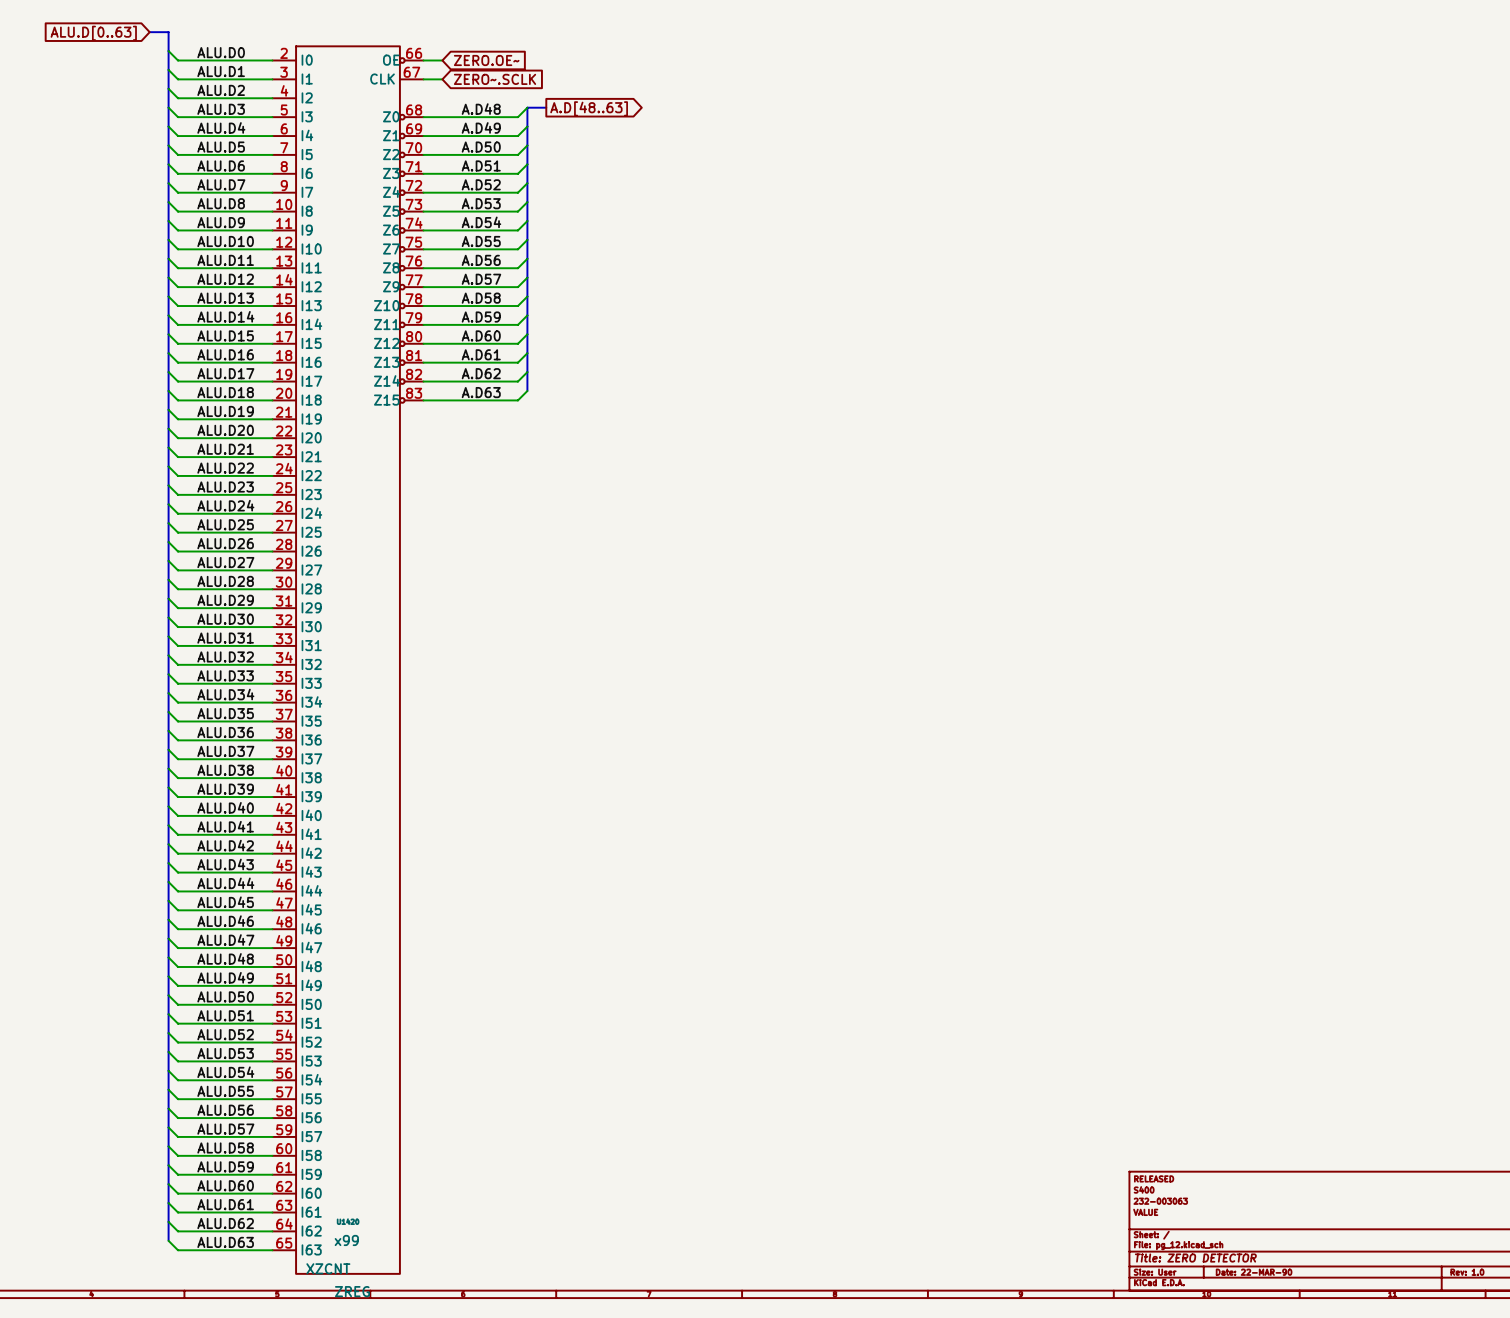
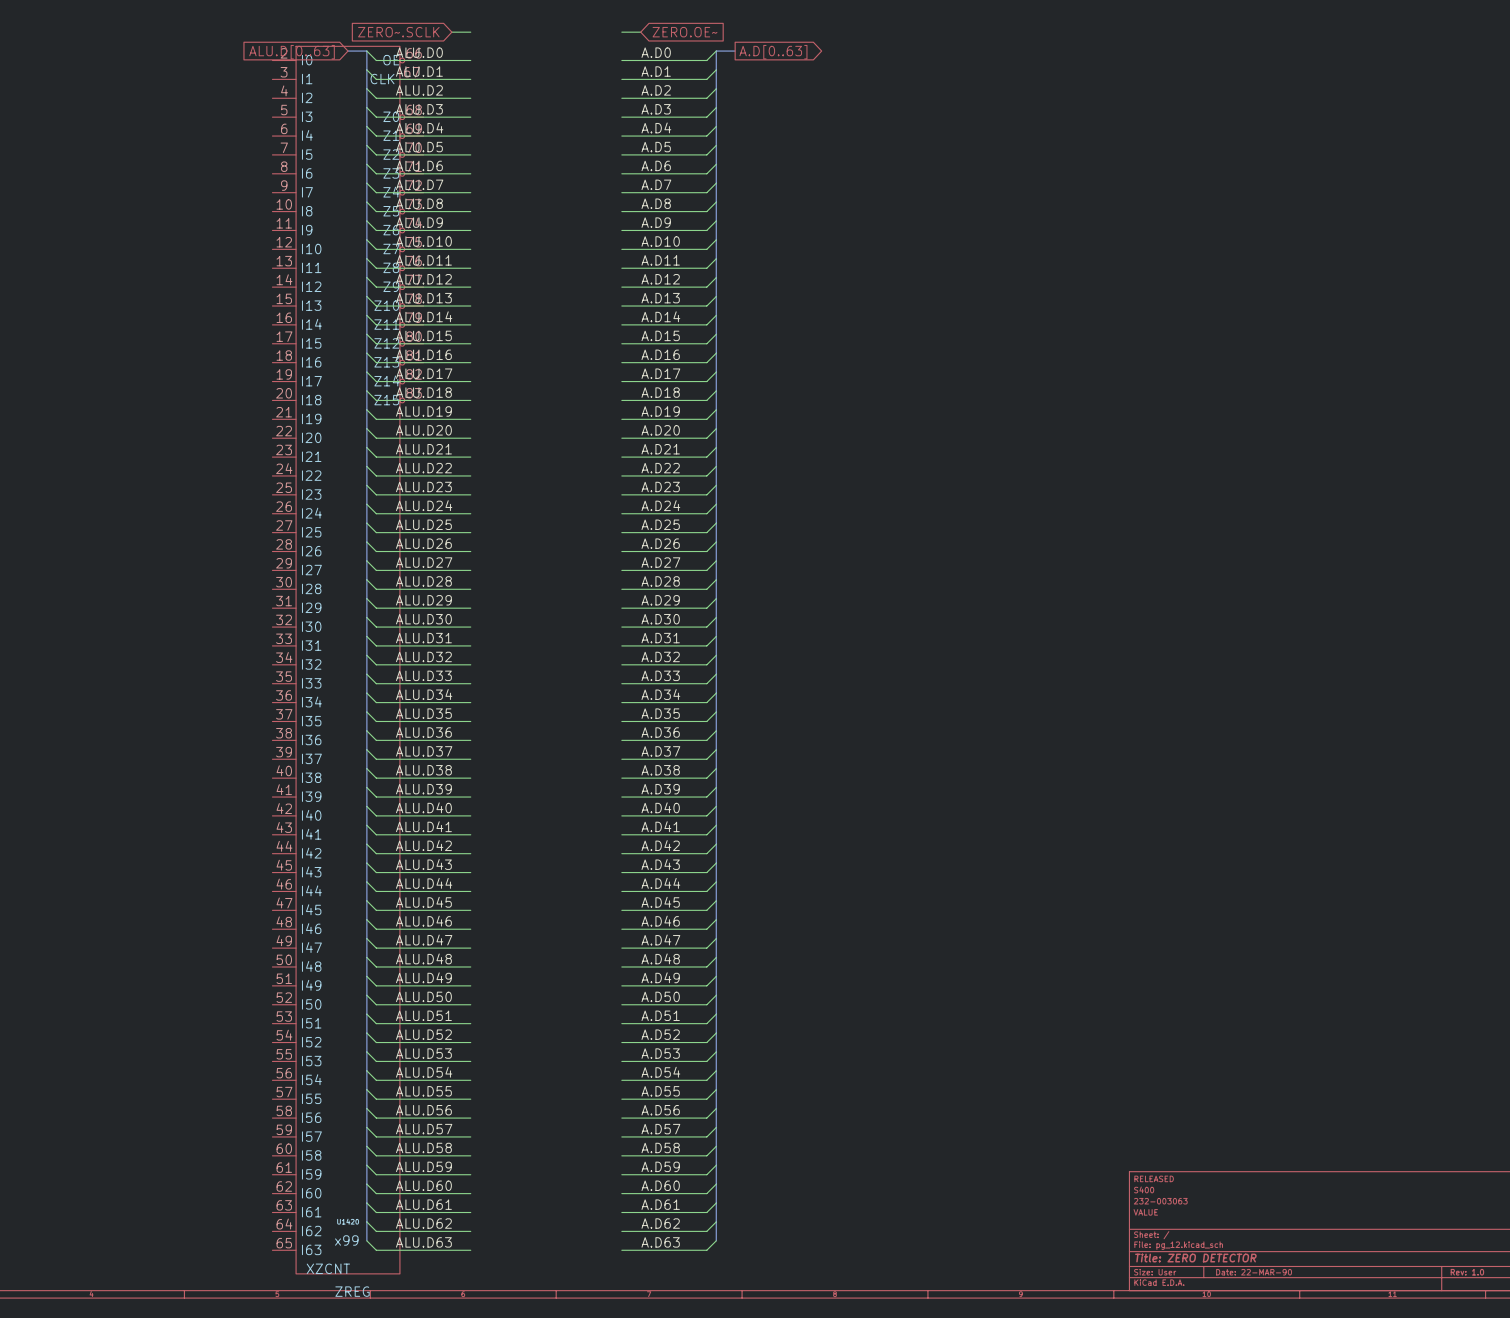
bus: (149, 32) (168, 32) (168, 1240) -> none
wire: none -> (451, 32) (470, 32)
wire: none -> (621, 32) (640, 32)
global label: none -> ZERO.OE~ (684, 32)
global label: ALU.D[0..63] (93, 33) -> none
wire: (168, 51) (178, 60) (272, 60) -> none
bus: none -> (348, 51) (366, 51) (366, 1240)
wire: none -> (366, 51) (376, 60) (423, 60)
wire: none -> (716, 51) (706, 60) (621, 60)
bus: none -> (735, 51) (716, 51) (716, 1240)
label: ALU.D0 (221, 52) -> none
global label: none -> ALU.D[0..63] (292, 52)
label: none -> ALU.D0 (419, 52)
label: none -> A.D0 (656, 52)
global label: none -> A.D[0..63] (773, 52)
wire: none -> (442, 60) (470, 60)
global label: ZERO.OE~ (486, 60) -> none
wire: (168, 69) (178, 79) (272, 79) -> none
wire: none -> (366, 69) (376, 79) (423, 79)
wire: none -> (716, 69) (706, 79) (621, 79)
label: ALU.D1 (221, 71) -> none
label: none -> ALU.D1 (419, 71)
label: none -> A.D1 (656, 71)
wire: none -> (442, 79) (470, 79)
global label rotation: 0° (495, 79) -> 180° (398, 32)
wire: (168, 88) (178, 98) (272, 98) -> none
wire: none -> (366, 88) (376, 98) (470, 98)
wire: none -> (716, 88) (706, 98) (621, 98)
label: ALU.D2 (221, 90) -> none
label: none -> ALU.D2 (419, 90)
label: none -> A.D2 (656, 90)
wire: (168, 107) (178, 117) (272, 117) -> none
wire: none -> (366, 107) (376, 117) (423, 117)
wire: (527, 107) (517, 117) (470, 117) -> none
bus: (546, 107) (527, 107) (527, 390) -> none
wire: none -> (716, 107) (706, 117) (621, 117)
global label: A.D[48..63] (589, 108) -> none
label: ALU.D3 (221, 109) -> none
label: none -> ALU.D3 (419, 109)
label: A.D48 (481, 109) -> none
label: none -> A.D3 (656, 109)
wire: (168, 126) (178, 136) (272, 136) -> none
wire: none -> (366, 126) (376, 136) (423, 136)
wire: (527, 126) (517, 136) (470, 136) -> none
wire: none -> (716, 126) (706, 136) (621, 136)
label: ALU.D4 (221, 127) -> none
label: none -> ALU.D4 (419, 127)
label: A.D49 (481, 127) -> none
label: none -> A.D4 (656, 127)
wire: (168, 145) (178, 154) (272, 154) -> none
wire: none -> (366, 145) (376, 154) (423, 154)
wire: (527, 145) (517, 154) (470, 154) -> none
wire: none -> (716, 145) (706, 154) (621, 154)
label: ALU.D5 (221, 147) -> none
label: none -> ALU.D5 (419, 147)
label: A.D50 (481, 147) -> none
label: none -> A.D5 (656, 147)
wire: (168, 164) (178, 173) (272, 173) -> none
wire: none -> (366, 164) (376, 173) (423, 173)
wire: (527, 164) (517, 173) (470, 173) -> none
wire: none -> (716, 164) (706, 173) (621, 173)
label: ALU.D6 (221, 165) -> none
label: none -> ALU.D6 (419, 165)
label: A.D51 (481, 165) -> none
label: none -> A.D6 (656, 165)
wire: (168, 183) (178, 192) (272, 192) -> none
wire: none -> (366, 183) (376, 192) (423, 192)
wire: (527, 183) (517, 192) (470, 192) -> none
wire: none -> (716, 183) (706, 192) (621, 192)
label: ALU.D7 (221, 184) -> none
label: none -> ALU.D7 (419, 184)
label: A.D52 (481, 184) -> none
label: none -> A.D7 (656, 184)
wire: (168, 202) (178, 211) (272, 211) -> none
wire: none -> (366, 202) (376, 211) (423, 211)
wire: (527, 202) (517, 211) (470, 211) -> none
wire: none -> (716, 202) (706, 211) (621, 211)
label: ALU.D8 (221, 203) -> none
label: none -> ALU.D8 (419, 203)
label: A.D53 (481, 203) -> none
label: none -> A.D8 (656, 203)
wire: (168, 221) (178, 230) (272, 230) -> none
wire: none -> (366, 221) (376, 230) (423, 230)
wire: (527, 221) (517, 230) (470, 230) -> none
wire: none -> (716, 221) (706, 230) (621, 230)
label: ALU.D9 (221, 222) -> none
label: none -> ALU.D9 (419, 222)
label: A.D54 (481, 222) -> none
label: none -> A.D9 (656, 222)
wire: (168, 239) (178, 249) (272, 249) -> none
wire: none -> (366, 239) (376, 249) (423, 249)
wire: (527, 239) (517, 249) (470, 249) -> none
wire: none -> (716, 239) (706, 249) (621, 249)
label: ALU.D10 (225, 241) -> none
label: none -> ALU.D10 (423, 241)
label: A.D55 (481, 241) -> none
label: none -> A.D10 (660, 241)
wire: (168, 258) (178, 268) (272, 268) -> none
wire: none -> (366, 258) (376, 268) (423, 268)
wire: (527, 258) (517, 268) (470, 268) -> none
wire: none -> (716, 258) (706, 268) (621, 268)
label: ALU.D11 (225, 260) -> none
label: none -> ALU.D11 (423, 260)
label: A.D56 (481, 260) -> none
label: none -> A.D11 (660, 260)
wire: (168, 277) (178, 287) (272, 287) -> none
wire: none -> (366, 277) (376, 287) (423, 287)
wire: (527, 277) (517, 287) (470, 287) -> none
wire: none -> (716, 277) (706, 287) (621, 287)
label: ALU.D12 (225, 279) -> none
label: none -> ALU.D12 (423, 279)
label: A.D57 (481, 279) -> none
label: none -> A.D12 (660, 279)
wire: (168, 296) (178, 306) (272, 306) -> none
wire: none -> (366, 296) (376, 306) (423, 306)
wire: (527, 296) (517, 306) (470, 306) -> none
wire: none -> (716, 296) (706, 306) (621, 306)
label: ALU.D13 (225, 298) -> none
label: none -> ALU.D13 (423, 298)
label: A.D58 (481, 298) -> none
label: none -> A.D13 (660, 298)
wire: (168, 315) (178, 324) (272, 324) -> none
wire: none -> (366, 315) (376, 324) (423, 324)
wire: (527, 315) (517, 324) (470, 324) -> none
wire: none -> (716, 315) (706, 324) (621, 324)
label: ALU.D14 (225, 316) -> none
label: none -> ALU.D14 (424, 316)
label: none -> A.D14 (660, 316)
label: A.D59 (481, 317) -> none
wire: (168, 334) (178, 343) (272, 343) -> none
wire: none -> (366, 334) (376, 343) (423, 343)
wire: (527, 334) (517, 343) (470, 343) -> none
wire: none -> (716, 334) (706, 343) (621, 343)
label: ALU.D15 (225, 335) -> none
label: none -> ALU.D15 (423, 335)
label: A.D60 (481, 335) -> none
label: none -> A.D15 (660, 335)
wire: (168, 353) (178, 362) (272, 362) -> none
wire: none -> (366, 353) (376, 362) (423, 362)
wire: (527, 353) (517, 362) (470, 362) -> none
wire: none -> (716, 353) (706, 362) (621, 362)
label: ALU.D16 (225, 354) -> none
label: none -> ALU.D16 (423, 354)
label: A.D61 (481, 354) -> none
label: none -> A.D16 (660, 354)
wire: (168, 372) (178, 381) (272, 381) -> none
wire: none -> (366, 372) (376, 381) (423, 381)
wire: (527, 372) (517, 381) (470, 381) -> none
wire: none -> (716, 372) (706, 381) (621, 381)
label: ALU.D17 (225, 373) -> none
label: none -> ALU.D17 (424, 373)
label: A.D62 (481, 373) -> none
label: none -> A.D17 (660, 373)
wire: (168, 390) (178, 400) (272, 400) -> none
wire: none -> (366, 390) (376, 400) (423, 400)
wire: (527, 390) (517, 400) (470, 400) -> none
wire: none -> (716, 390) (706, 400) (621, 400)
label: ALU.D18 (225, 392) -> none
label: none -> ALU.D18 (423, 392)
label: A.D63 (481, 392) -> none
label: none -> A.D18 (660, 392)
wire: (168, 409) (178, 419) (272, 419) -> none
wire: none -> (366, 409) (376, 419) (470, 419)
wire: none -> (716, 409) (706, 419) (621, 419)
label: ALU.D19 (225, 411) -> none
label: none -> ALU.D19 (423, 411)
label: none -> A.D19 (660, 411)
wire: (168, 428) (178, 438) (272, 438) -> none
wire: none -> (366, 428) (376, 438) (470, 438)
wire: none -> (716, 428) (706, 438) (621, 438)
label: ALU.D20 (225, 430) -> none
label: none -> ALU.D20 (423, 430)
label: none -> A.D20 (660, 430)
wire: (168, 447) (178, 457) (272, 457) -> none
wire: none -> (366, 447) (376, 457) (470, 457)
wire: none -> (716, 447) (706, 457) (621, 457)
label: ALU.D21 (225, 449) -> none
label: none -> ALU.D21 (423, 449)
label: none -> A.D21 (660, 449)
wire: (168, 466) (178, 475) (272, 475) -> none
wire: none -> (366, 466) (376, 475) (470, 475)
wire: none -> (716, 466) (706, 475) (621, 475)
label: ALU.D22 (225, 468) -> none
label: none -> ALU.D22 (423, 468)
label: none -> A.D22 (660, 468)
wire: (168, 485) (178, 494) (272, 494) -> none
wire: none -> (366, 485) (376, 494) (470, 494)
wire: none -> (716, 485) (706, 494) (621, 494)
label: ALU.D23 (225, 487) -> none
label: none -> ALU.D23 (423, 487)
label: none -> A.D23 (660, 487)
wire: (168, 504) (178, 513) (272, 513) -> none
wire: none -> (366, 504) (376, 513) (470, 513)
wire: none -> (716, 504) (706, 513) (621, 513)
label: ALU.D24 (225, 505) -> none
label: none -> ALU.D24 (424, 505)
label: none -> A.D24 (660, 505)
wire: (168, 523) (178, 532) (272, 532) -> none
wire: none -> (366, 523) (376, 532) (470, 532)
wire: none -> (716, 523) (706, 532) (621, 532)
label: ALU.D25 (225, 524) -> none
label: none -> ALU.D25 (423, 524)
label: none -> A.D25 (660, 524)
wire: (168, 542) (178, 551) (272, 551) -> none
wire: none -> (366, 542) (376, 551) (470, 551)
wire: none -> (716, 542) (706, 551) (621, 551)
label: ALU.D26 (225, 543) -> none
label: none -> ALU.D26 (423, 543)
label: none -> A.D26 (660, 543)
wire: (168, 560) (178, 570) (272, 570) -> none
wire: none -> (366, 560) (376, 570) (470, 570)
wire: none -> (716, 560) (706, 570) (621, 570)
label: ALU.D27 (225, 562) -> none
label: none -> ALU.D27 (424, 562)
label: none -> A.D27 (660, 562)
wire: (168, 579) (178, 589) (272, 589) -> none
wire: none -> (366, 579) (376, 589) (470, 589)
wire: none -> (716, 579) (706, 589) (621, 589)
label: ALU.D28 (225, 581) -> none
label: none -> ALU.D28 (423, 581)
label: none -> A.D28 (660, 581)
wire: (168, 598) (178, 608) (272, 608) -> none
wire: none -> (366, 598) (376, 608) (470, 608)
wire: none -> (716, 598) (706, 608) (621, 608)
label: ALU.D29 (225, 600) -> none
label: none -> ALU.D29 (423, 600)
label: none -> A.D29 (660, 600)
wire: (168, 617) (178, 627) (272, 627) -> none
wire: none -> (366, 617) (376, 627) (470, 627)
wire: none -> (716, 617) (706, 627) (621, 627)
label: ALU.D30 (225, 619) -> none
label: none -> ALU.D30 (423, 619)
label: none -> A.D30 (660, 619)
wire: (168, 636) (178, 645) (272, 645) -> none
wire: none -> (366, 636) (376, 645) (470, 645)
wire: none -> (716, 636) (706, 645) (621, 645)
label: ALU.D31 (225, 638) -> none
label: none -> ALU.D31 (423, 638)
label: none -> A.D31 (660, 638)
wire: (168, 655) (178, 664) (272, 664) -> none
wire: none -> (366, 655) (376, 664) (470, 664)
wire: none -> (716, 655) (706, 664) (621, 664)
label: ALU.D32 (225, 656) -> none
label: none -> ALU.D32 (423, 656)
label: none -> A.D32 (660, 656)
wire: (168, 674) (178, 683) (272, 683) -> none
wire: none -> (366, 674) (376, 683) (470, 683)
wire: none -> (716, 674) (706, 683) (621, 683)
label: ALU.D33 (225, 675) -> none
label: none -> ALU.D33 (423, 675)
label: none -> A.D33 (660, 675)
wire: (168, 693) (178, 702) (272, 702) -> none
wire: none -> (366, 693) (376, 702) (470, 702)
wire: none -> (716, 693) (706, 702) (621, 702)
label: ALU.D34 (225, 694) -> none
label: none -> ALU.D34 (424, 694)
label: none -> A.D34 (660, 694)
wire: (168, 712) (178, 721) (272, 721) -> none
wire: none -> (366, 712) (376, 721) (470, 721)
wire: none -> (716, 712) (706, 721) (621, 721)
label: ALU.D35 (225, 713) -> none
label: none -> ALU.D35 (423, 713)
label: none -> A.D35 (660, 713)
wire: (168, 730) (178, 740) (272, 740) -> none
wire: none -> (366, 730) (376, 740) (470, 740)
wire: none -> (716, 730) (706, 740) (621, 740)
label: ALU.D36 (225, 732) -> none
label: none -> ALU.D36 (423, 732)
label: none -> A.D36 (660, 732)
wire: (168, 749) (178, 759) (272, 759) -> none
wire: none -> (366, 749) (376, 759) (470, 759)
wire: none -> (716, 749) (706, 759) (621, 759)
label: ALU.D37 (225, 751) -> none
label: none -> ALU.D37 (424, 751)
label: none -> A.D37 (660, 751)
wire: (168, 768) (178, 778) (272, 778) -> none
wire: none -> (366, 768) (376, 778) (470, 778)
wire: none -> (716, 768) (706, 778) (621, 778)
label: ALU.D38 (225, 770) -> none
label: none -> ALU.D38 (423, 770)
label: none -> A.D38 (660, 770)
wire: (168, 787) (178, 797) (272, 797) -> none
wire: none -> (366, 787) (376, 797) (470, 797)
wire: none -> (716, 787) (706, 797) (621, 797)
label: ALU.D39 (225, 789) -> none
label: none -> ALU.D39 (423, 789)
label: none -> A.D39 (660, 789)
wire: (168, 806) (178, 815) (272, 815) -> none
wire: none -> (366, 806) (376, 815) (470, 815)
wire: none -> (716, 806) (706, 815) (621, 815)
label: ALU.D40 (225, 807) -> none
label: none -> ALU.D40 (423, 807)
label: none -> A.D40 (660, 807)
wire: (168, 825) (178, 834) (272, 834) -> none
wire: none -> (366, 825) (376, 834) (470, 834)
wire: none -> (716, 825) (706, 834) (621, 834)
label: ALU.D41 (225, 826) -> none
label: none -> ALU.D41 (423, 826)
label: none -> A.D41 (660, 826)
wire: (168, 844) (178, 853) (272, 853) -> none
wire: none -> (366, 844) (376, 853) (470, 853)
wire: none -> (716, 844) (706, 853) (621, 853)
label: ALU.D42 (225, 845) -> none
label: none -> ALU.D42 (423, 845)
label: none -> A.D42 (660, 845)
wire: (168, 863) (178, 872) (272, 872) -> none
wire: none -> (366, 863) (376, 872) (470, 872)
wire: none -> (716, 863) (706, 872) (621, 872)
label: ALU.D43 (225, 864) -> none
label: none -> ALU.D43 (423, 864)
label: none -> A.D43 (660, 864)
wire: (168, 882) (178, 891) (272, 891) -> none
wire: none -> (366, 882) (376, 891) (470, 891)
wire: none -> (716, 882) (706, 891) (621, 891)
label: ALU.D44 (225, 883) -> none
label: none -> ALU.D44 (424, 883)
label: none -> A.D44 (660, 883)
wire: (168, 900) (178, 910) (272, 910) -> none
wire: none -> (366, 900) (376, 910) (470, 910)
wire: none -> (716, 900) (706, 910) (621, 910)
label: ALU.D45 (225, 902) -> none
label: none -> ALU.D45 (423, 902)
label: none -> A.D45 (660, 902)
wire: (168, 919) (178, 929) (272, 929) -> none
wire: none -> (366, 919) (376, 929) (470, 929)
wire: none -> (716, 919) (706, 929) (621, 929)
label: ALU.D46 (225, 921) -> none
label: none -> ALU.D46 (423, 921)
label: none -> A.D46 (660, 921)
wire: (168, 938) (178, 948) (272, 948) -> none
wire: none -> (366, 938) (376, 948) (470, 948)
wire: none -> (716, 938) (706, 948) (621, 948)
label: ALU.D47 (225, 940) -> none
label: none -> ALU.D47 (424, 940)
label: none -> A.D47 (660, 940)
wire: (168, 957) (178, 966) (272, 966) -> none
wire: none -> (366, 957) (376, 966) (470, 966)
wire: none -> (716, 957) (706, 966) (621, 966)
label: ALU.D48 (225, 958) -> none
label: none -> ALU.D48 (423, 958)
label: none -> A.D48 (660, 958)
wire: (168, 976) (178, 985) (272, 985) -> none
wire: none -> (366, 976) (376, 985) (470, 985)
wire: none -> (716, 976) (706, 985) (621, 985)
label: ALU.D49 (225, 977) -> none
label: none -> ALU.D49 (423, 977)
label: none -> A.D49 (660, 977)
wire: (168, 995) (178, 1004) (272, 1004) -> none
wire: none -> (366, 995) (376, 1004) (470, 1004)
wire: none -> (716, 995) (706, 1004) (621, 1004)
label: ALU.D50 (225, 996) -> none
label: none -> ALU.D50 (423, 996)
label: none -> A.D50 (660, 996)
wire: (168, 1014) (178, 1023) (272, 1023) -> none
wire: none -> (366, 1014) (376, 1023) (470, 1023)
wire: none -> (716, 1014) (706, 1023) (621, 1023)
label: ALU.D51 (225, 1015) -> none
label: none -> ALU.D51 (423, 1015)
label: none -> A.D51 (660, 1015)
wire: (168, 1033) (178, 1042) (272, 1042) -> none
wire: none -> (366, 1033) (376, 1042) (470, 1042)
wire: none -> (716, 1033) (706, 1042) (621, 1042)
label: ALU.D52 (225, 1034) -> none
label: none -> ALU.D52 (423, 1034)
label: none -> A.D52 (660, 1034)
wire: (168, 1051) (178, 1061) (272, 1061) -> none
wire: none -> (366, 1051) (376, 1061) (470, 1061)
wire: none -> (716, 1051) (706, 1061) (621, 1061)
label: ALU.D53 (225, 1053) -> none
label: none -> ALU.D53 (423, 1053)
label: none -> A.D53 (660, 1053)
wire: (168, 1070) (178, 1080) (272, 1080) -> none
wire: none -> (366, 1070) (376, 1080) (470, 1080)
wire: none -> (716, 1070) (706, 1080) (621, 1080)
label: ALU.D54 (225, 1072) -> none
label: none -> ALU.D54 (424, 1072)
label: none -> A.D54 (660, 1072)
wire: (168, 1089) (178, 1099) (272, 1099) -> none
wire: none -> (366, 1089) (376, 1099) (470, 1099)
wire: none -> (716, 1089) (706, 1099) (621, 1099)
label: ALU.D55 (225, 1091) -> none
label: none -> ALU.D55 (423, 1091)
label: none -> A.D55 (660, 1091)
wire: (168, 1108) (178, 1118) (272, 1118) -> none
wire: none -> (366, 1108) (376, 1118) (470, 1118)
wire: none -> (716, 1108) (706, 1118) (621, 1118)
label: ALU.D56 (225, 1110) -> none
label: none -> ALU.D56 (423, 1110)
label: none -> A.D56 (660, 1110)
wire: (168, 1127) (178, 1136) (272, 1136) -> none
wire: none -> (366, 1127) (376, 1136) (470, 1136)
wire: none -> (716, 1127) (706, 1136) (621, 1136)
label: ALU.D57 (225, 1129) -> none
label: none -> ALU.D57 (424, 1129)
label: none -> A.D57 (660, 1129)
wire: (168, 1146) (178, 1155) (272, 1155) -> none
wire: none -> (366, 1146) (376, 1155) (470, 1155)
wire: none -> (716, 1146) (706, 1155) (621, 1155)
label: ALU.D58 (225, 1147) -> none
label: none -> ALU.D58 (423, 1147)
label: none -> A.D58 (660, 1147)
wire: (168, 1165) (178, 1174) (272, 1174) -> none
wire: none -> (366, 1165) (376, 1174) (470, 1174)
wire: none -> (716, 1165) (706, 1174) (621, 1174)
label: ALU.D59 (225, 1166) -> none
label: none -> ALU.D59 (423, 1166)
label: none -> A.D59 (660, 1166)
wire: (168, 1184) (178, 1193) (272, 1193) -> none
wire: none -> (366, 1184) (376, 1193) (470, 1193)
wire: none -> (716, 1184) (706, 1193) (621, 1193)
label: ALU.D60 (225, 1185) -> none
label: none -> ALU.D60 (423, 1185)
label: none -> A.D60 (660, 1185)
wire: (168, 1203) (178, 1212) (272, 1212) -> none
wire: none -> (366, 1203) (376, 1212) (470, 1212)
wire: none -> (716, 1203) (706, 1212) (621, 1212)
label: ALU.D61 (225, 1204) -> none
label: none -> ALU.D61 (423, 1204)
label: none -> A.D61 (660, 1204)
wire: (168, 1221) (178, 1231) (272, 1231) -> none
wire: none -> (366, 1221) (376, 1231) (470, 1231)
wire: none -> (716, 1221) (706, 1231) (621, 1231)
label: ALU.D62 (225, 1223) -> none
label: none -> ALU.D62 (423, 1223)
label: none -> A.D62 (660, 1223)
wire: (168, 1240) (178, 1250) (272, 1250) -> none
wire: none -> (366, 1240) (376, 1250) (470, 1250)
wire: none -> (716, 1240) (706, 1250) (621, 1250)
label: ALU.D63 (225, 1242) -> none
label: none -> ALU.D63 (423, 1242)
label: none -> A.D63 (660, 1242)

